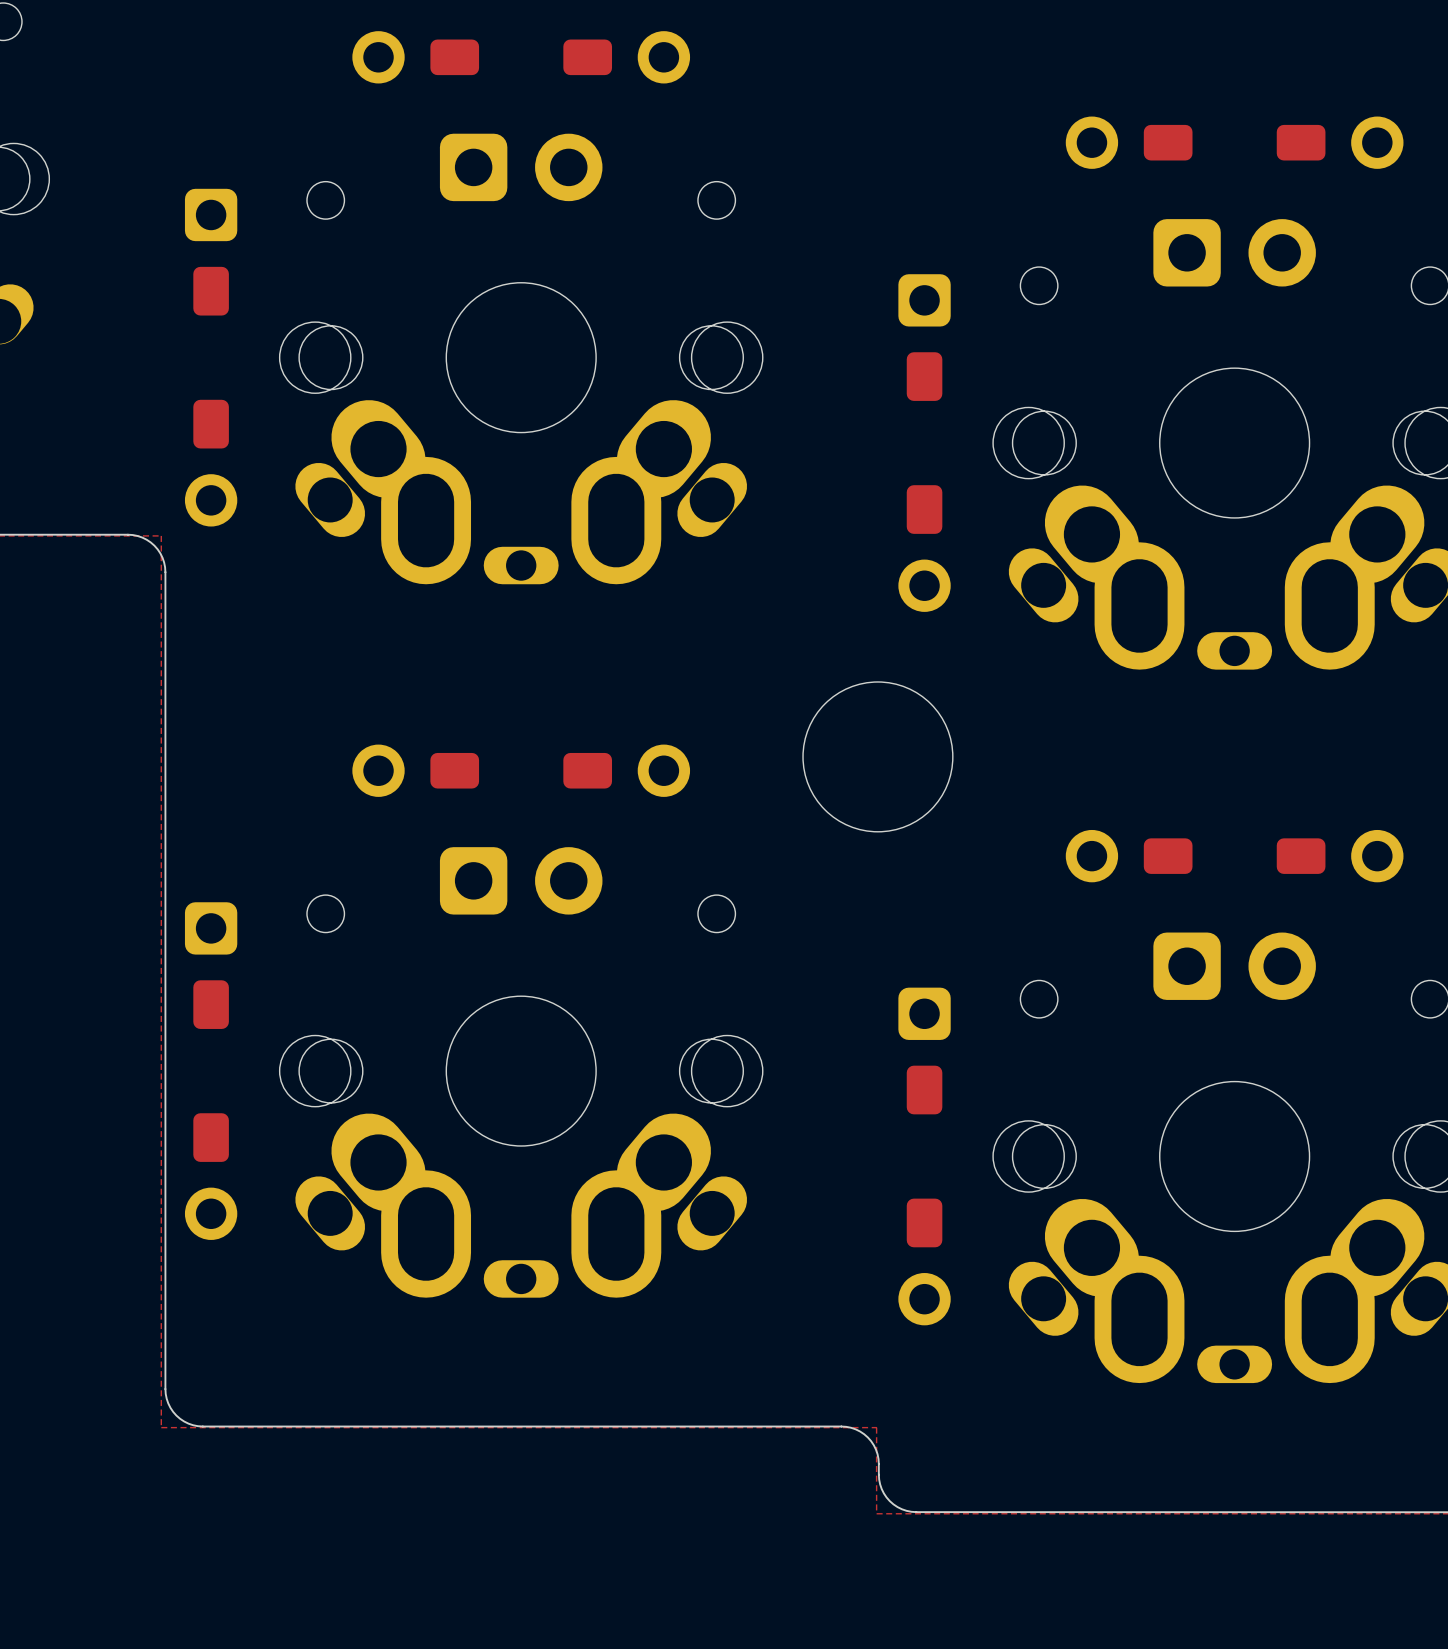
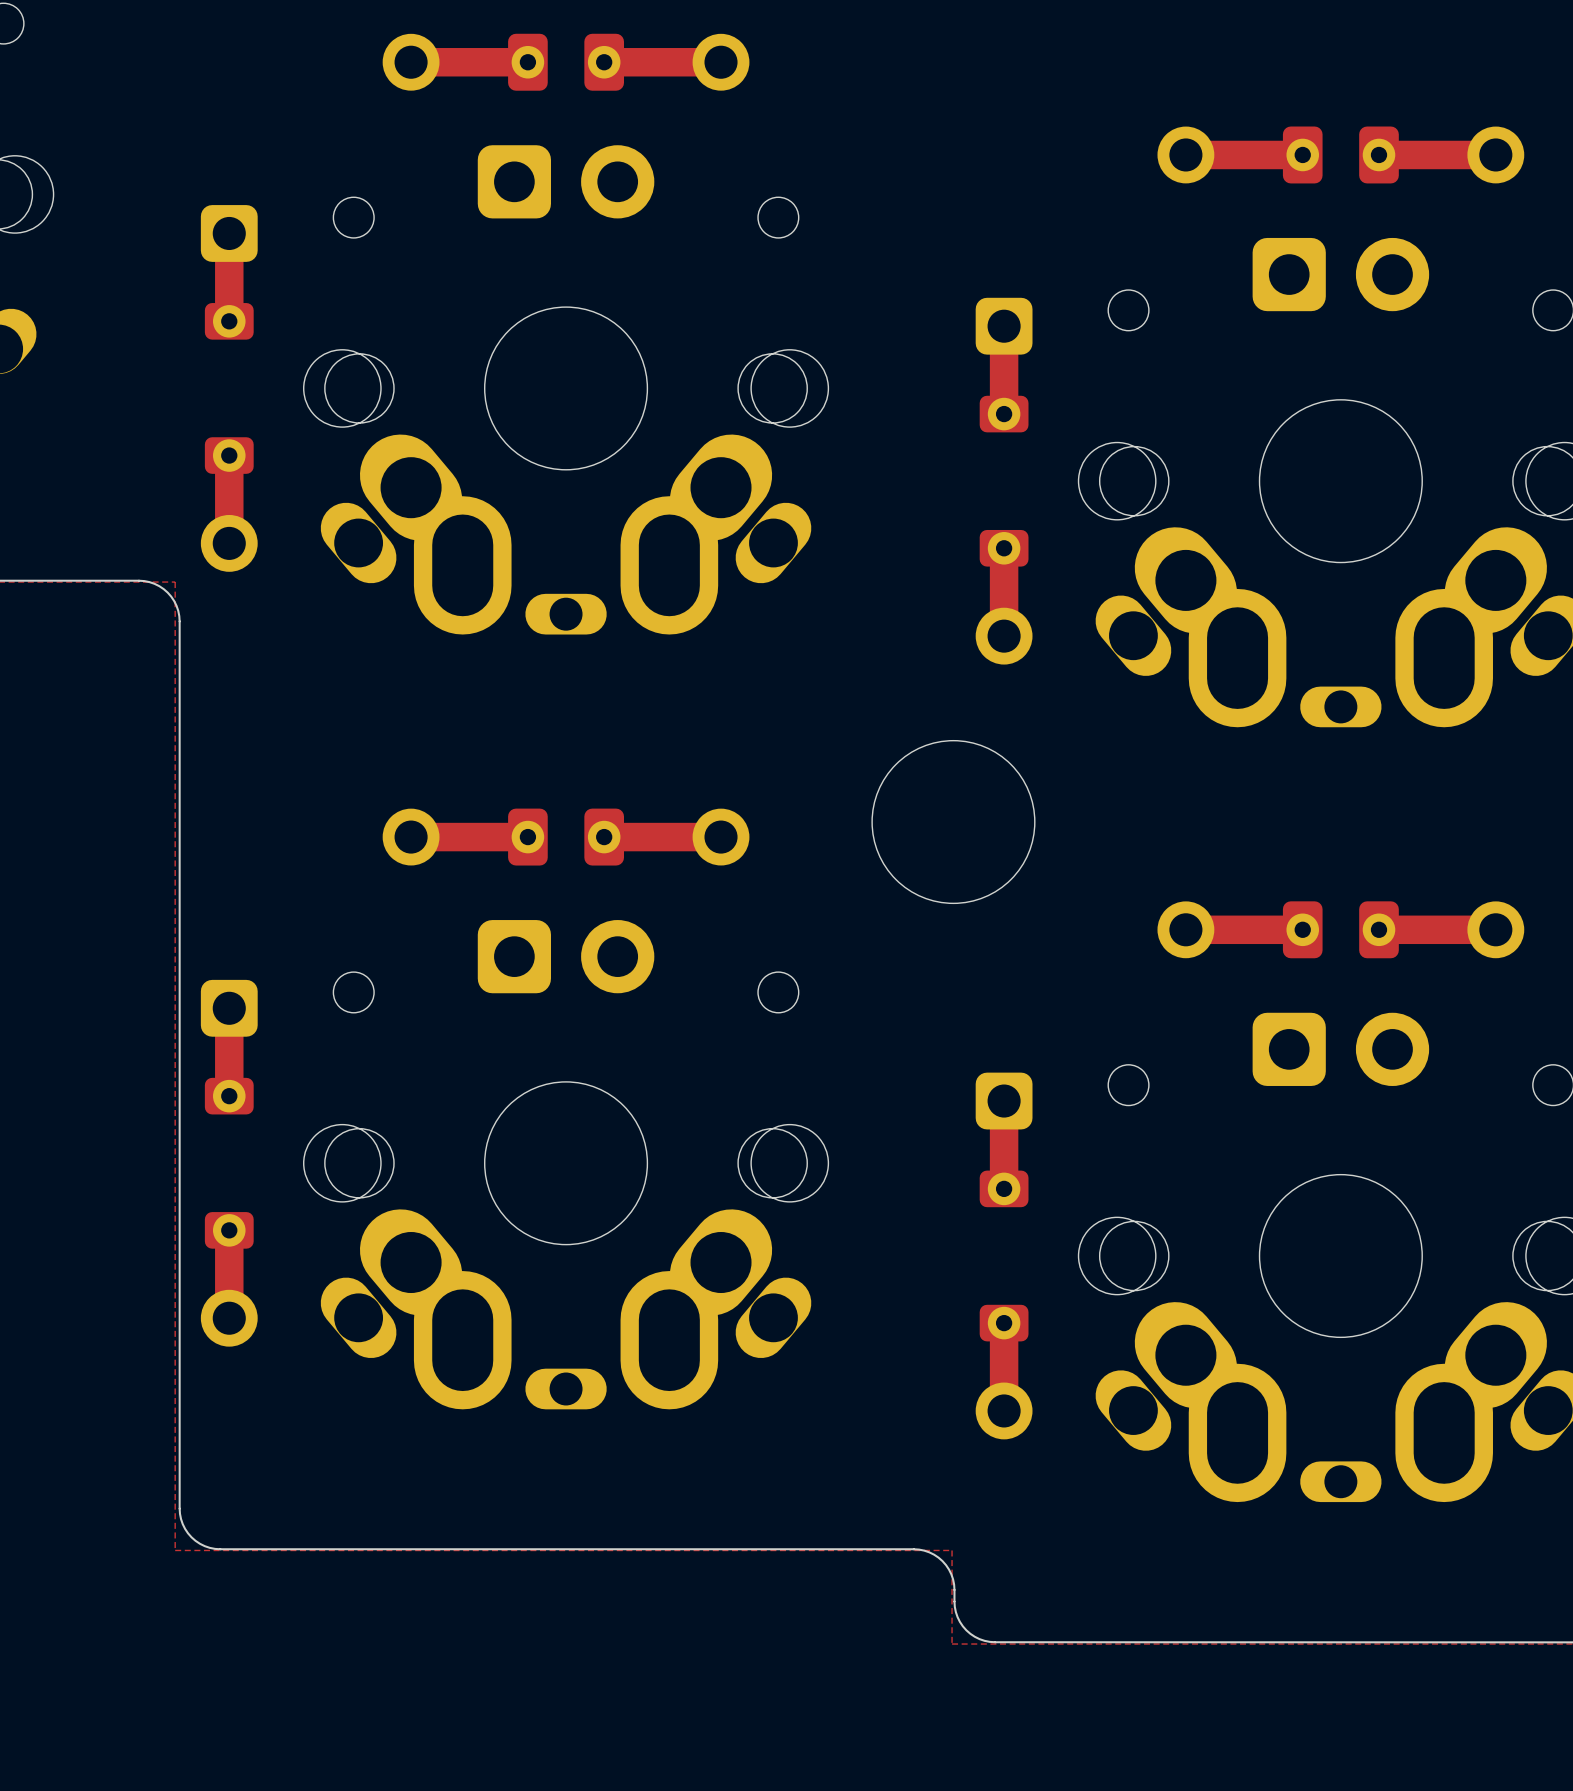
part footprint: [352, 31, 691, 84] -> [382, 33, 750, 91]
part footprint: [1065, 116, 1404, 169] -> [1157, 126, 1525, 184]
part footprint: [184, 188, 238, 527] -> [200, 205, 258, 572]
part footprint: [898, 274, 951, 612] -> [975, 297, 1033, 665]
part footprint: [352, 744, 691, 797] -> [382, 808, 750, 866]
part footprint: [1065, 829, 1404, 883] -> [1157, 901, 1525, 959]
part footprint: [184, 902, 238, 1240] -> [200, 979, 258, 1347]
part footprint: [898, 987, 951, 1326] -> [975, 1072, 1033, 1440]

